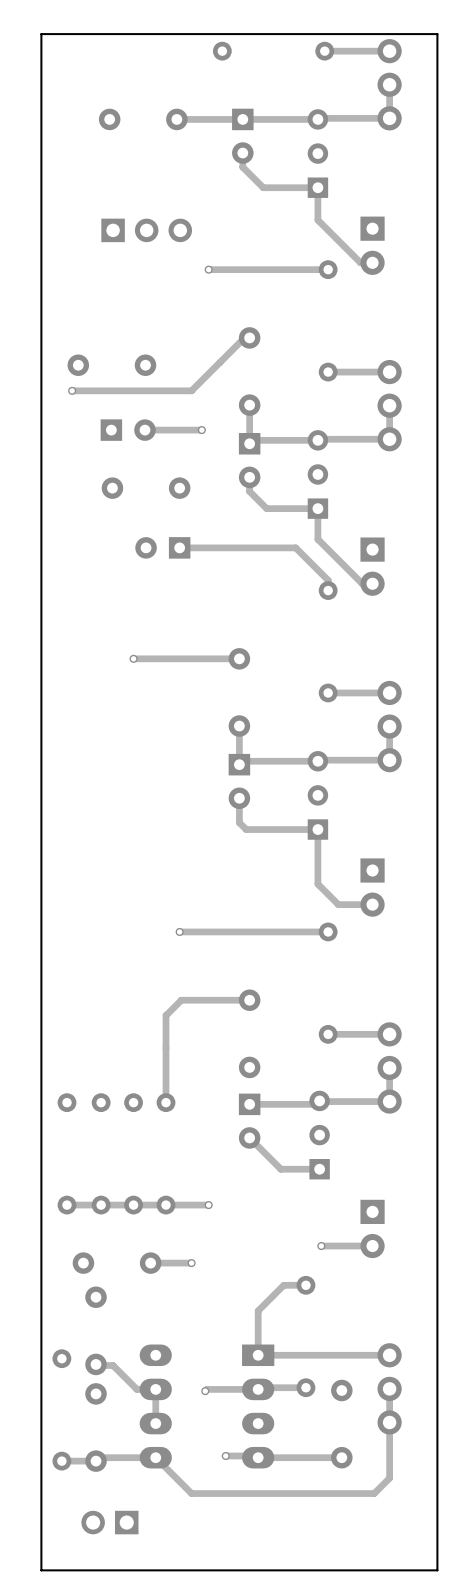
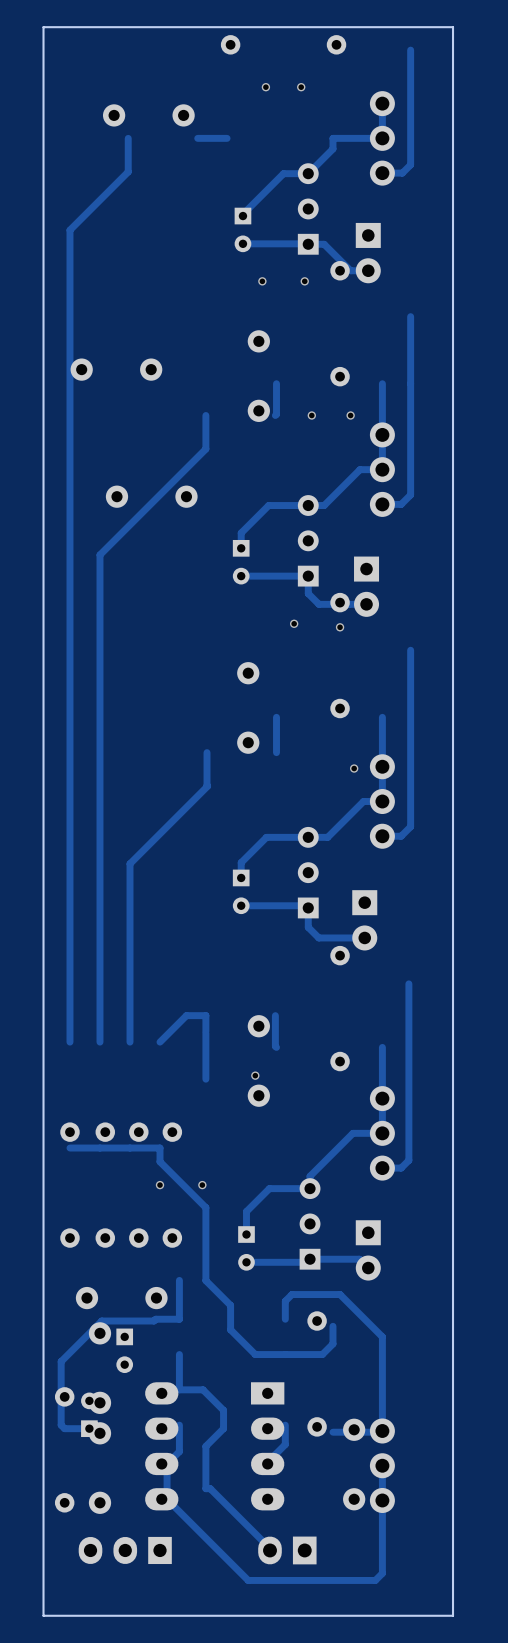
track: (389, 51) (324, 51) -> none
track: none -> (410, 50) (410, 164) (402, 173) (392, 173)
track: (389, 84) (389, 118) (177, 119) -> none
part position: (389, 84) -> (382, 138)
via: none -> (265, 87)
via: none -> (301, 87)
track: none -> (382, 103) (382, 138) (332, 138) (332, 148) (308, 173) (283, 173) (242, 216)
part: (242, 136) -> none
track: none -> (128, 138) (128, 171) (69, 230) (69, 1042)
track: none -> (227, 138) (197, 138)
track: (242, 153) (242, 167) (263, 187) (317, 187) (317, 220) (360, 262) (372, 262) -> none
part: (317, 153) -> none
part: none -> (308, 208)
part: (146, 230) -> none
part: none -> (242, 229)
track: none -> (242, 243) (324, 244) (350, 270) (368, 270)
part position: (372, 245) -> (368, 253)
via: (208, 269) -> none
track: (328, 269) (208, 269) -> none
via: none -> (262, 281)
via: none -> (304, 281)
track: none -> (410, 316) (410, 494) (401, 504) (392, 504)
track: (249, 337) (244, 337) (191, 390) (72, 390) -> none
track: (389, 372) (328, 372) -> none
track: none -> (276, 383) (275, 415)
track: none -> (382, 383) (382, 469) (360, 469) (324, 505) (268, 505) (241, 533) (241, 548)
via: (72, 390) -> none
track: (249, 405) (249, 443) (253, 440) (389, 439) (389, 405) -> none
part position: (389, 405) -> (382, 469)
track: none -> (205, 415) (205, 449) (99, 554) (99, 1042)
via: none -> (311, 415)
via: none -> (350, 415)
track: (145, 429) (201, 430) -> none
part: (128, 430) -> none
via: (201, 430) -> none
part: (249, 460) -> none
part: (317, 474) -> none
track: (249, 477) (249, 491) (266, 508) (317, 508) (317, 539) (362, 583) (372, 583) -> none
part: none -> (308, 540)
part: (162, 547) -> none
track: (179, 547) (295, 547) (328, 580) (328, 590) -> none
part: none -> (241, 562)
track: none -> (241, 576) (308, 576) (308, 593) (319, 604) (366, 604)
part position: (372, 566) -> (366, 586)
via: none -> (294, 623)
via: none -> (340, 627)
track: none -> (410, 650) (410, 826) (401, 836) (392, 836)
via: (133, 658) -> none
track: (239, 658) (133, 658) -> none
track: (389, 692) (328, 692) -> none
track: none -> (276, 717) (276, 752)
track: none -> (382, 717) (382, 801) (363, 801) (327, 837) (266, 837) (241, 862) (241, 877)
track: (239, 726) (239, 764) (242, 761) (389, 760) (389, 726) -> none
part position: (389, 726) -> (382, 801)
track: none -> (207, 752) (207, 786) (130, 863) (130, 1042)
via: none -> (354, 768)
part: (239, 781) -> none
part: (317, 795) -> none
track: (239, 798) (239, 822) (246, 829) (317, 829) (317, 884) (338, 904) (372, 904) -> none
part: none -> (308, 872)
part: none -> (241, 891)
track: none -> (241, 905) (306, 905) (308, 907) (308, 927) (318, 937) (364, 937)
part position: (372, 887) -> (364, 920)
via: (179, 931) -> none
track: (328, 931) (179, 931) -> none
track: none -> (408, 983) (408, 1160) (401, 1168) (392, 1168)
track: none -> (275, 1015) (276, 1047)
track: (249, 1000) (181, 1000) (166, 1015) (166, 1102) -> none
track: none -> (205, 1031) (205, 1015) (186, 1015) (160, 1042)
track: none -> (205, 1033) (205, 1079)
track: none -> (382, 1047) (382, 1133) (352, 1133) (310, 1176) (310, 1188) (269, 1188) (246, 1211) (246, 1234)
track: (389, 1034) (328, 1034) -> none
via: none -> (255, 1075)
track: (389, 1067) (389, 1101) (249, 1104) -> none
part position: (389, 1067) -> (382, 1133)
track: none -> (69, 1148) (160, 1148) (160, 1161) (205, 1207) (205, 1280) (230, 1305) (230, 1329) (255, 1354) (322, 1354) (332, 1343) (332, 1326)
part: (249, 1121) -> none
part: (319, 1135) -> none
track: (249, 1137) (280, 1169) (319, 1169) -> none
via: none -> (160, 1185)
via: none -> (202, 1185)
part: none -> (310, 1223)
track: (208, 1205) (67, 1205) -> none
via: (208, 1205) -> none
part: none -> (246, 1248)
track: none -> (246, 1262) (306, 1262) (310, 1259) (359, 1259) (368, 1268)
part position: (372, 1228) -> (368, 1250)
track: none -> (179, 1280) (179, 1319) (101, 1321) (61, 1361) (61, 1425) (64, 1428) (89, 1428)
via: (321, 1246) -> none
track: (372, 1246) (321, 1246) -> none
track: (191, 1263) (150, 1263) -> none
via: (191, 1263) -> none
track: none -> (285, 1319) (285, 1301) (291, 1294) (340, 1294) (382, 1336) (382, 1430) (332, 1432)
track: (305, 1285) (283, 1285) (258, 1310) (258, 1355) (389, 1355) -> none
part: none -> (124, 1350)
track: none -> (179, 1354) (179, 1389) (203, 1389) (223, 1410) (223, 1428) (205, 1446) (205, 1488) (210, 1488) (270, 1550)
track: (92, 1365) (113, 1365) (136, 1389) (155, 1389) (155, 1423) -> none
part: none -> (89, 1414)
track: none -> (179, 1425) (179, 1451) (167, 1463) (167, 1499) (248, 1580) (375, 1580) (382, 1573) (382, 1465)
track: none -> (285, 1425) (285, 1444) (265, 1463)
track: (305, 1387) (206, 1389) (205, 1391) -> none
track: (389, 1388) (389, 1478) (374, 1493) (191, 1493) (155, 1457) (99, 1457) (96, 1461) (61, 1461) -> none
part position: (389, 1388) -> (382, 1465)
via: (205, 1391) -> none
track: (225, 1455) (341, 1457) -> none
via: (225, 1455) -> none
part: none -> (125, 1550)
part: none -> (287, 1550)
part: (109, 1522) -> none

